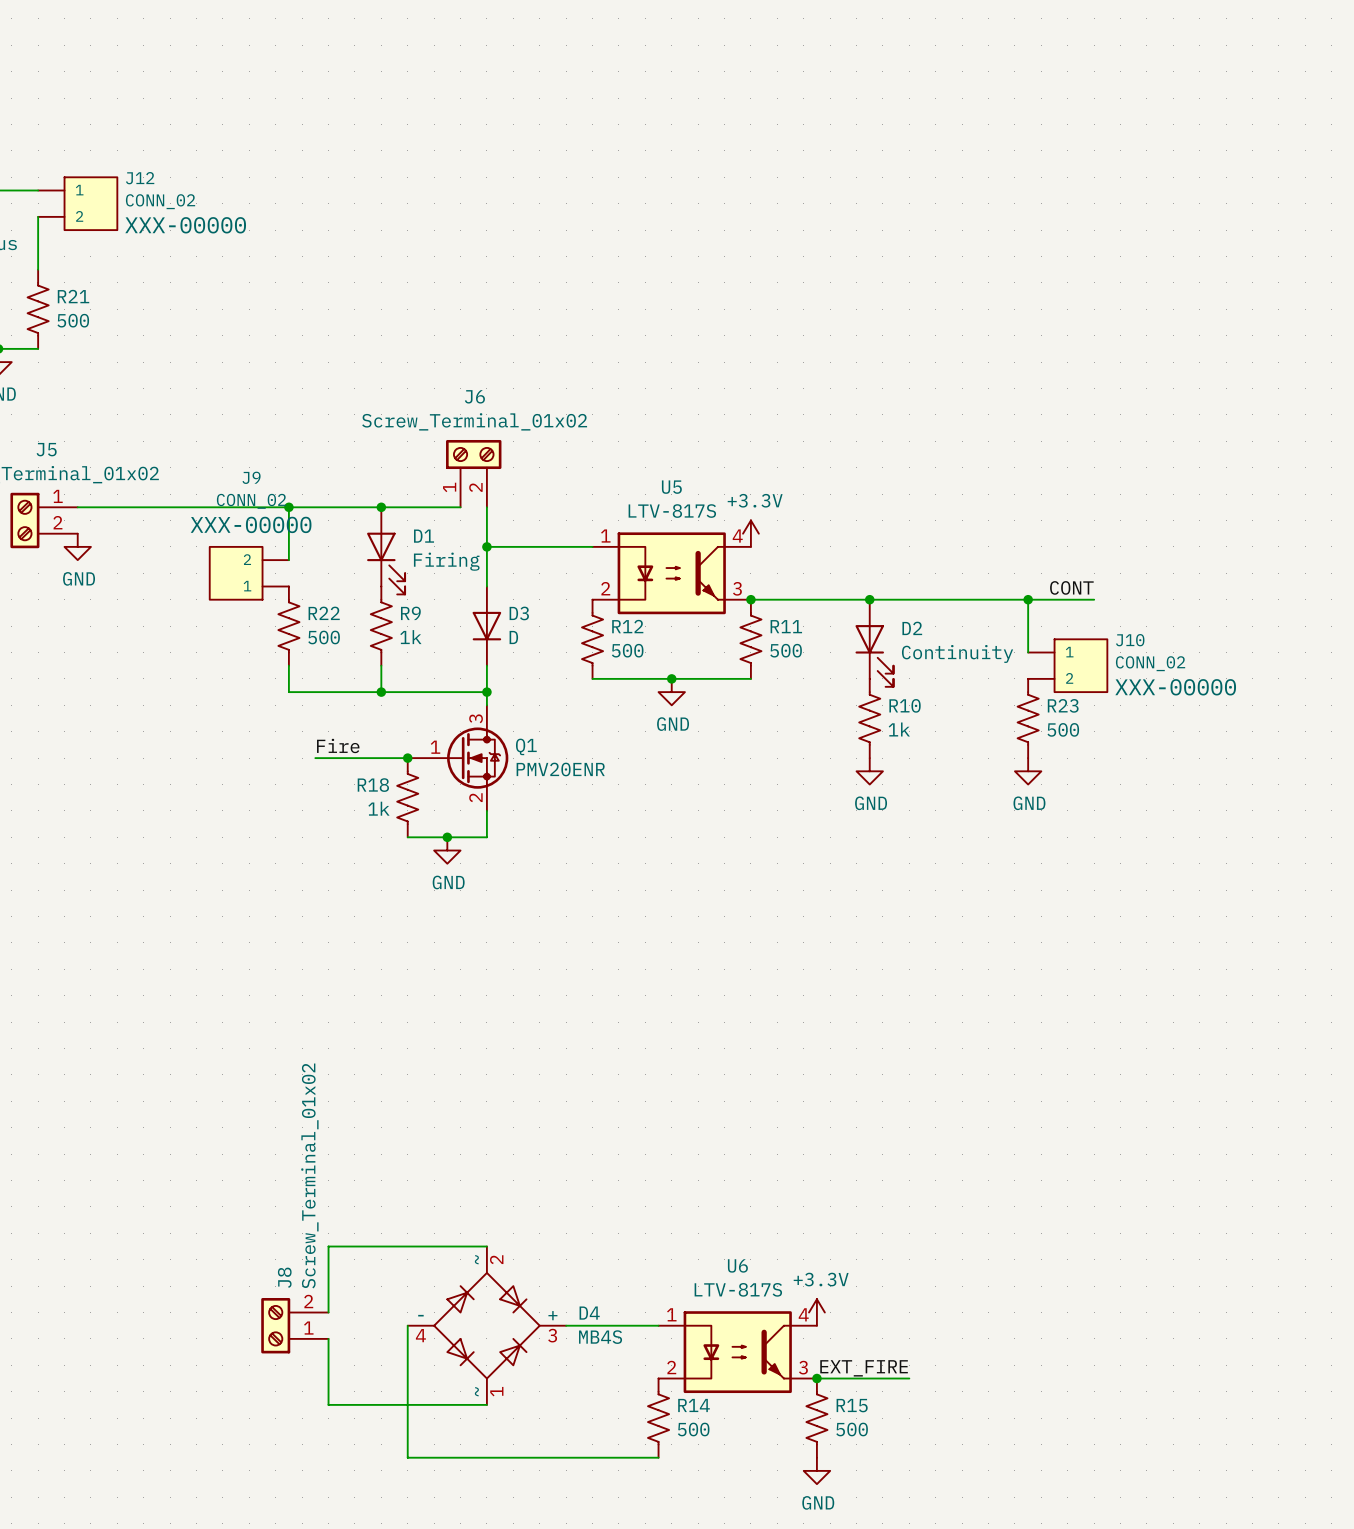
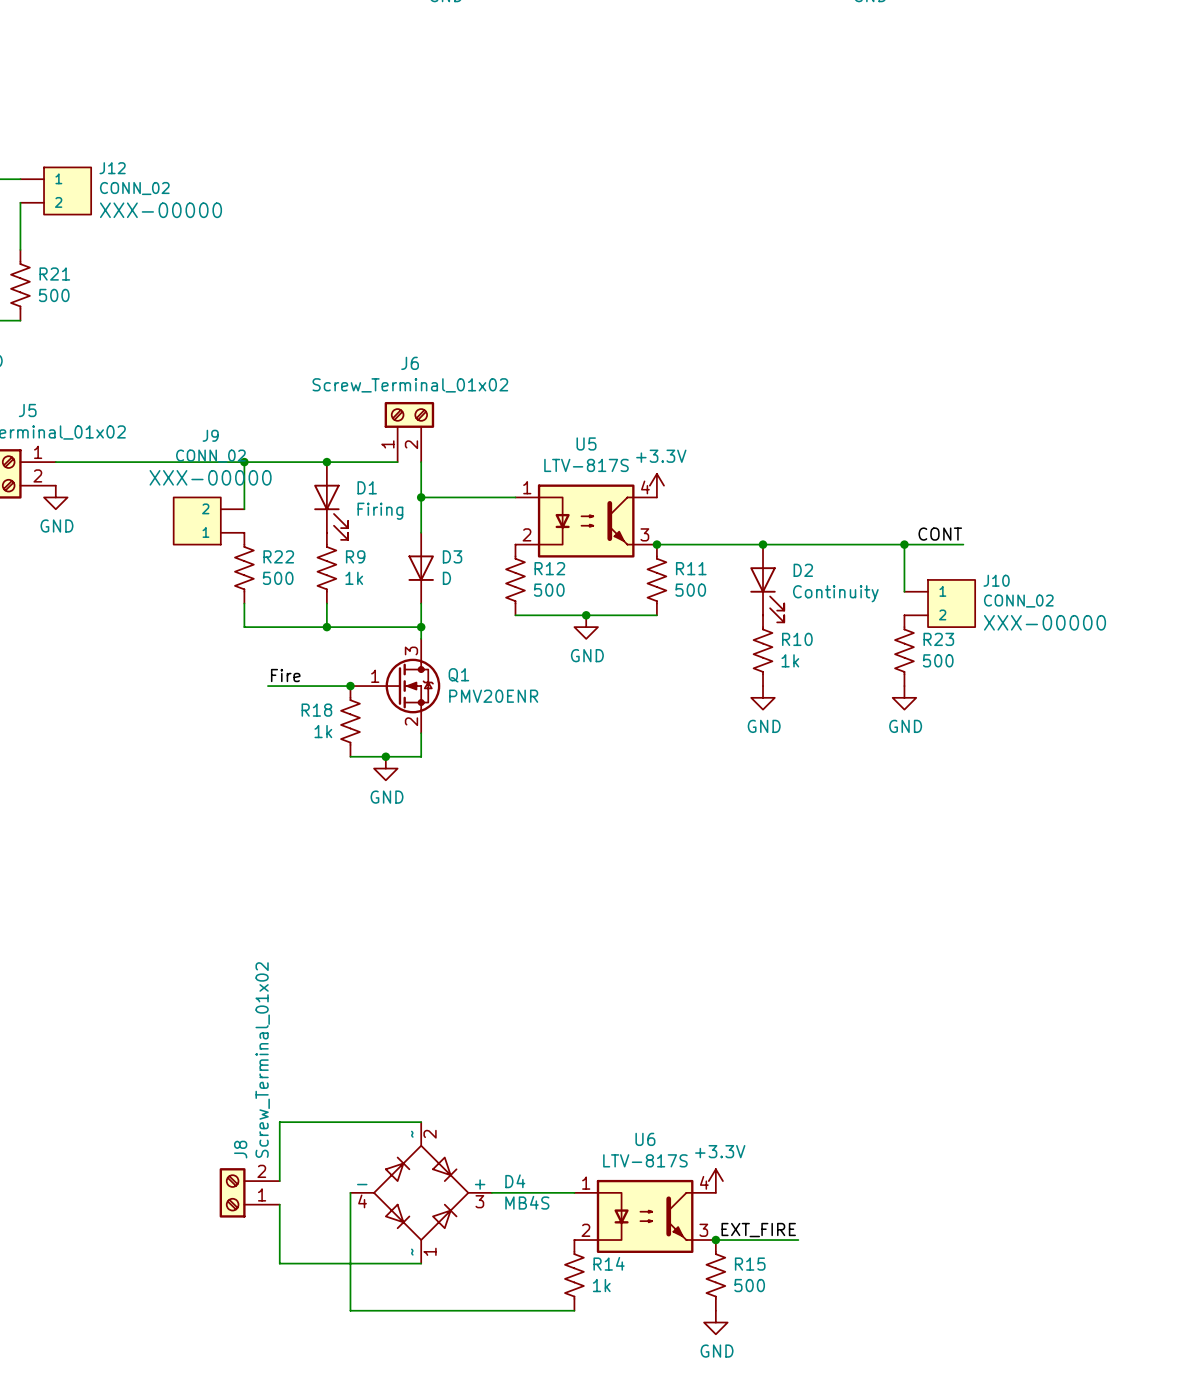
R14 value: 500 (693, 1429) -> 1k (601, 1285)

